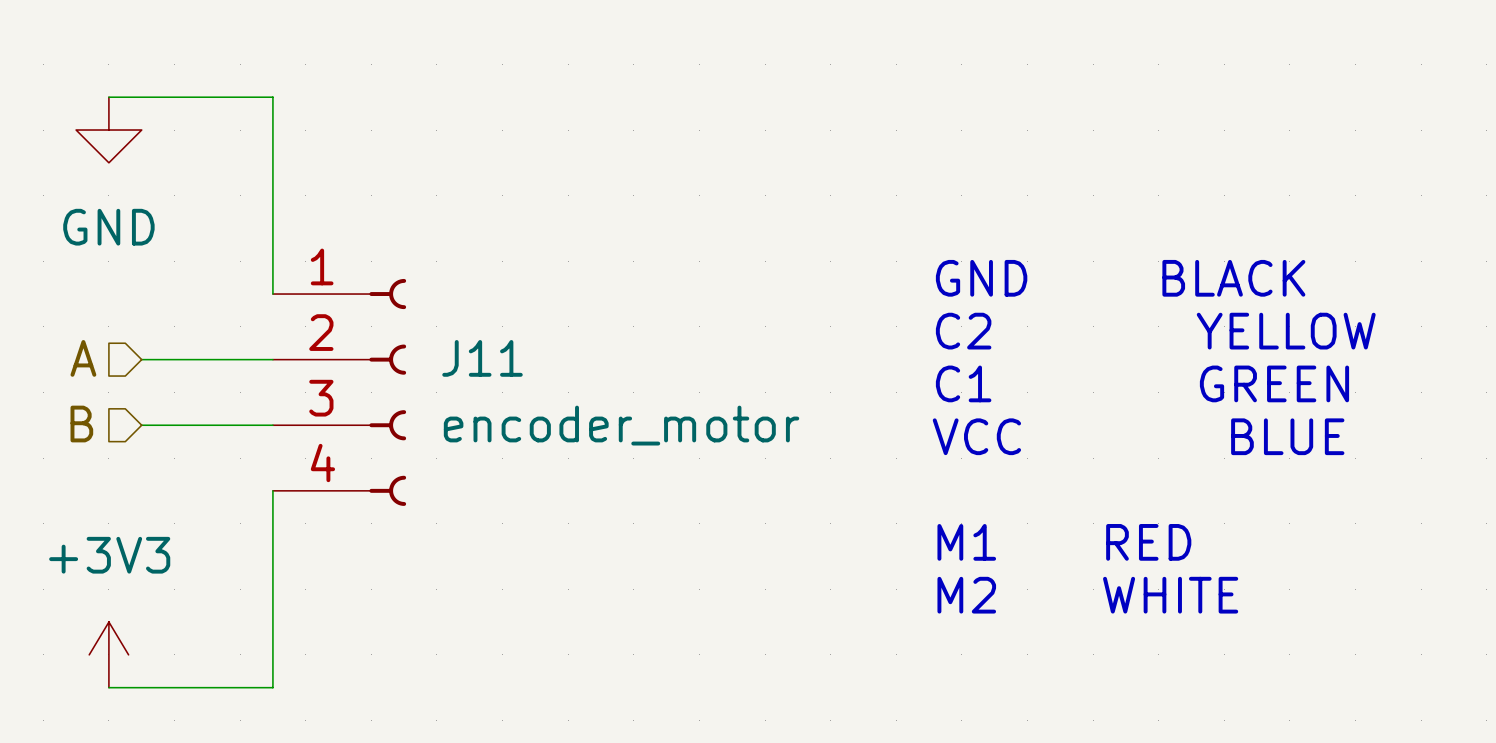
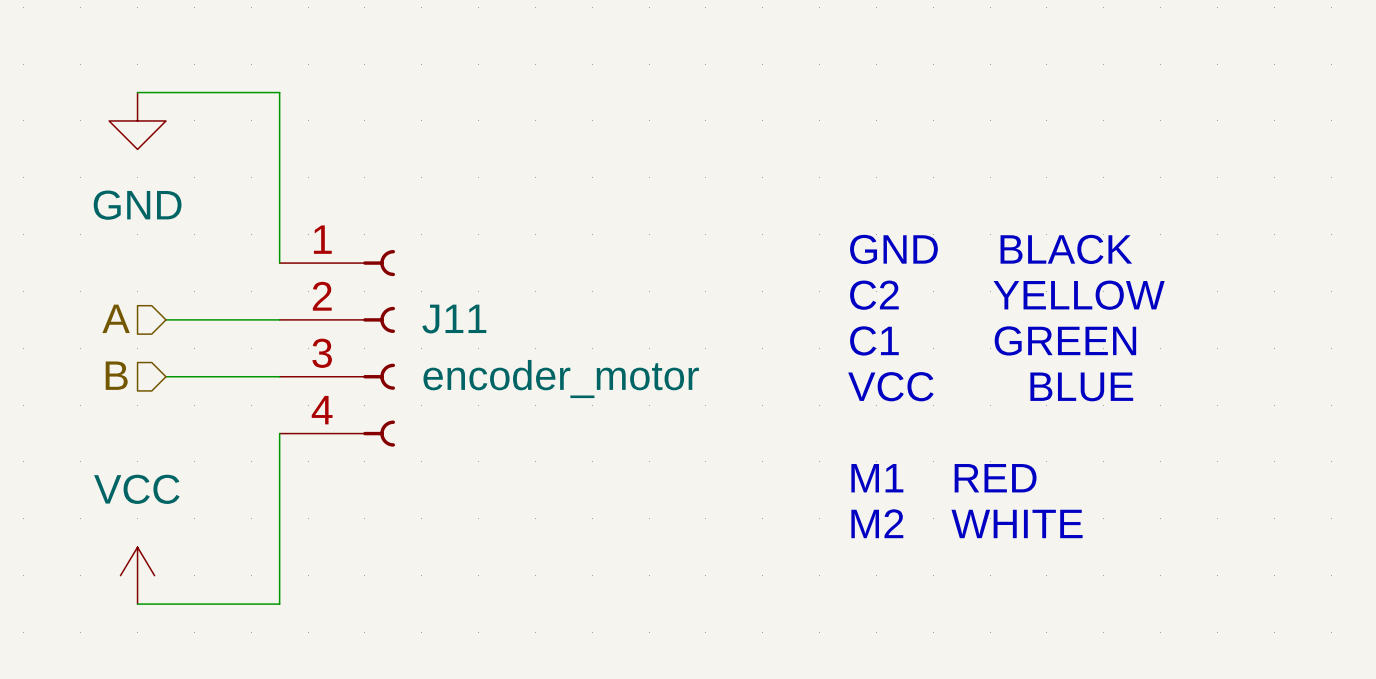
power symbol: +3V3 (108, 654) -> VCC (137, 575)

